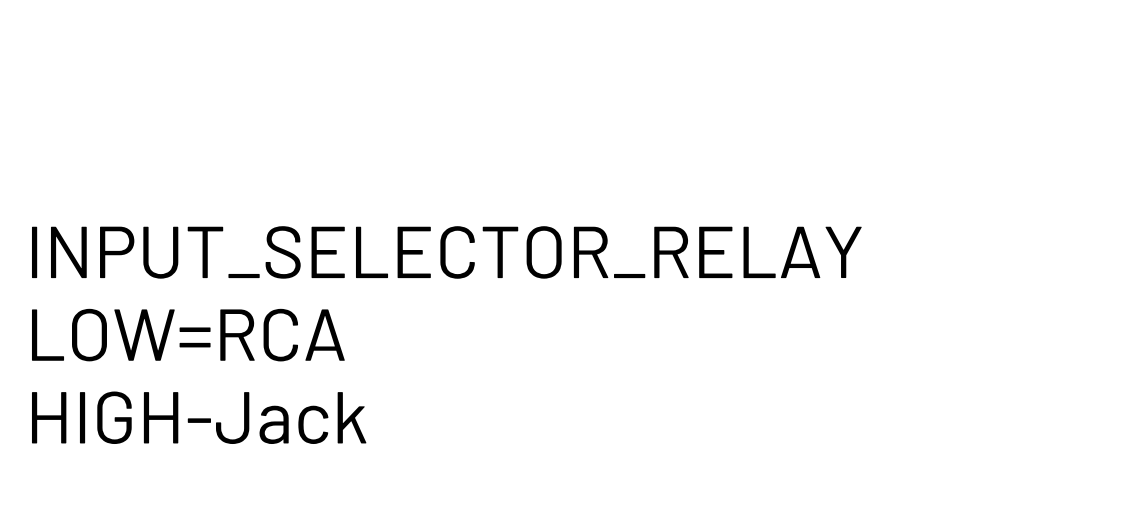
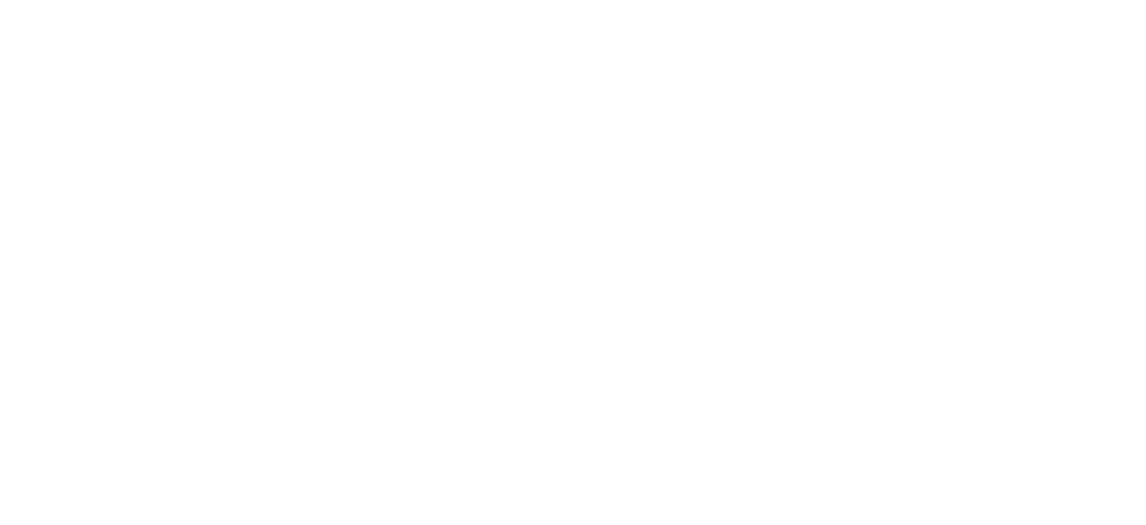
text: INPUT_SELECTOR_RELAY (446, 252) -> none
text: LOW=RCA (188, 335) -> none
text: HIGH-Jack (199, 417) -> none

